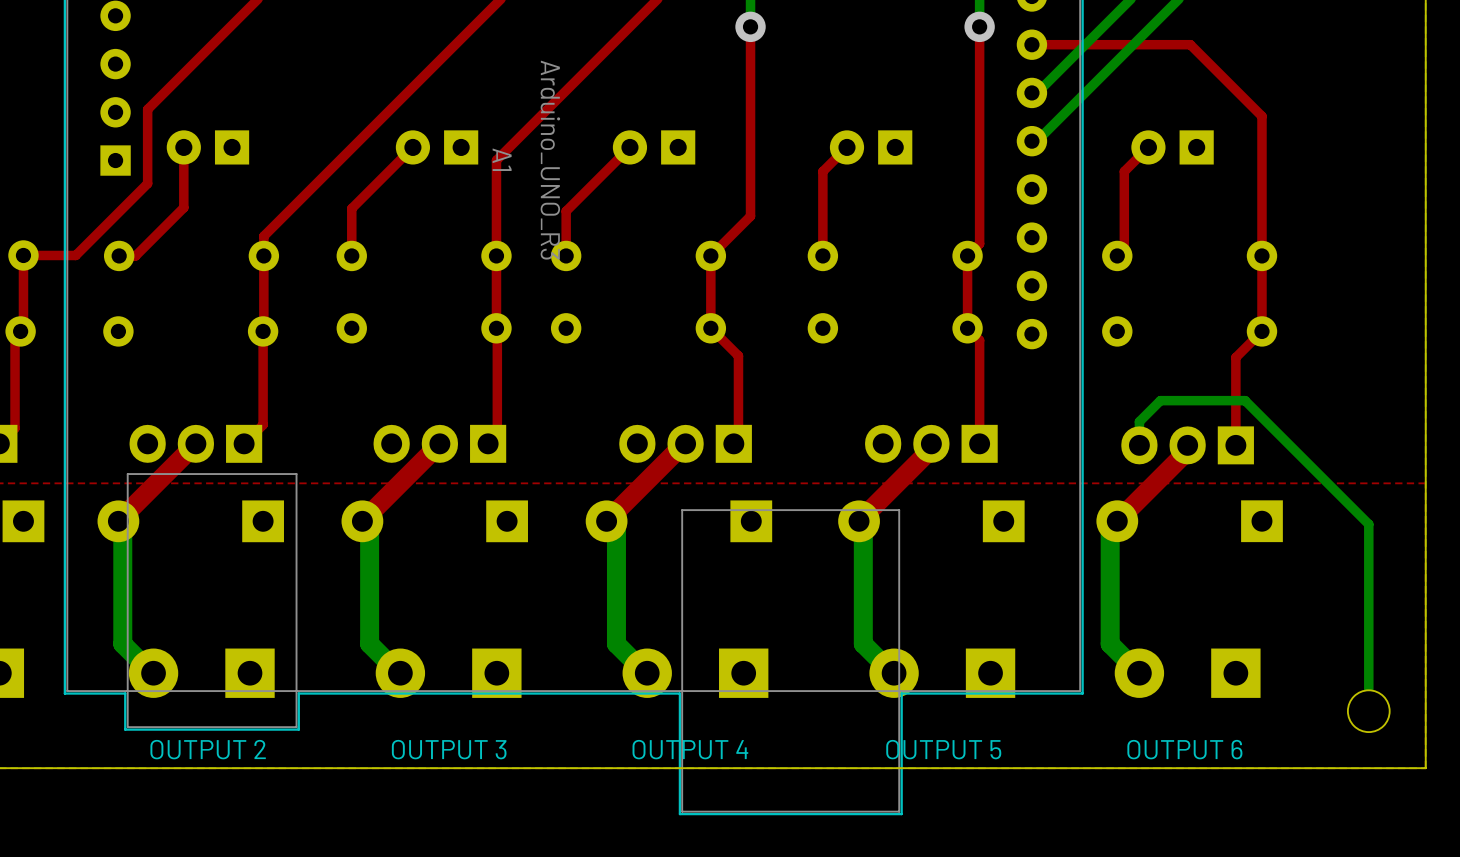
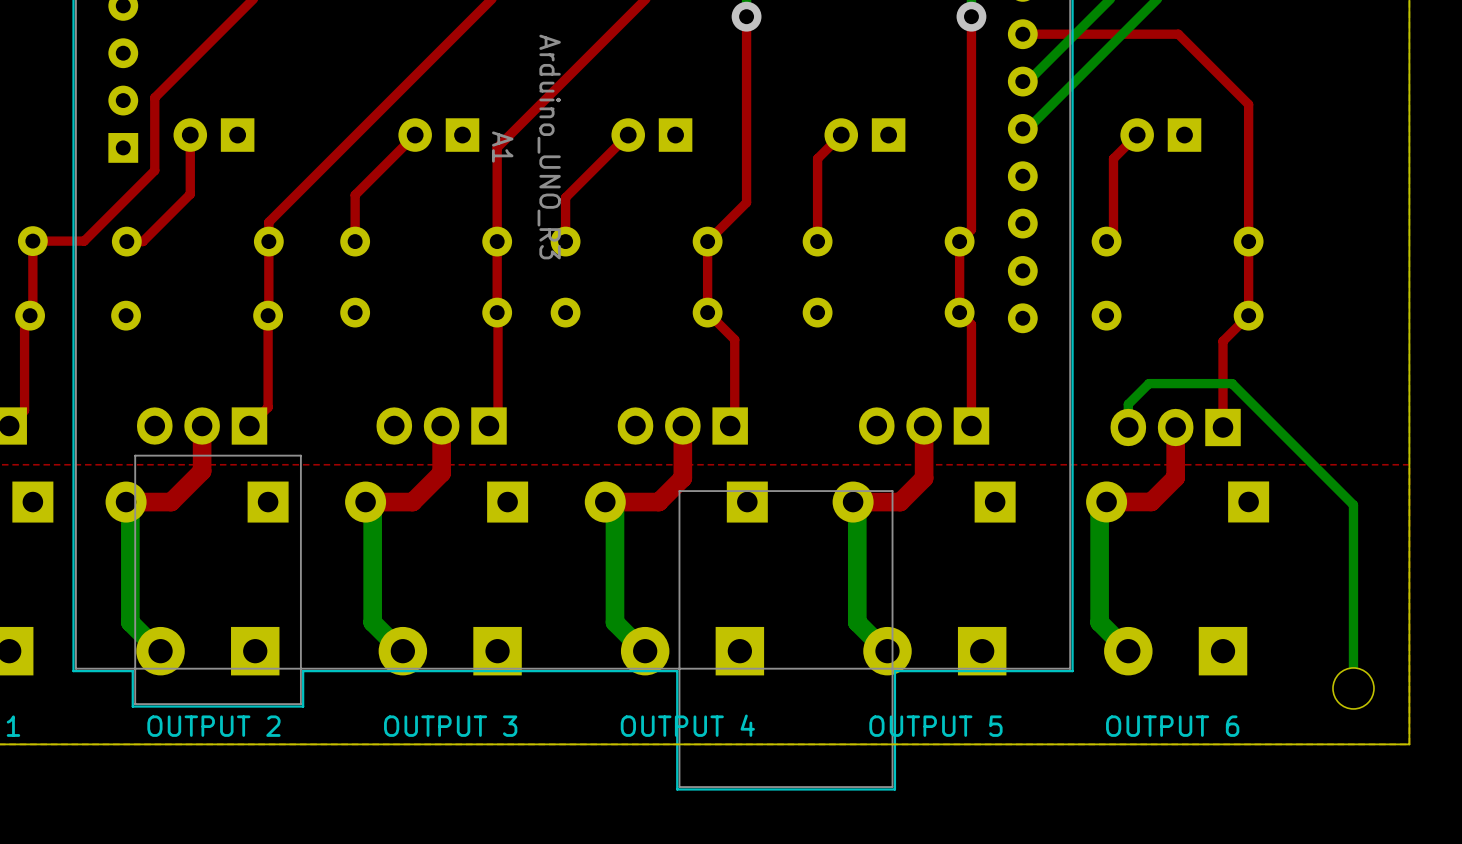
top track: (195, 443) (118, 521) -> (202, 426) (202, 471) (171, 502) (126, 502)
top track: (439, 443) (362, 521) -> (441, 426) (441, 473) (412, 502) (365, 502)
top track: (685, 443) (606, 521) -> (682, 426) (682, 478) (658, 502) (605, 502)
top track: (931, 448) (859, 521) -> (924, 431) (924, 478) (900, 502) (853, 502)
top track: (1187, 450) (1117, 521) -> (1175, 432) (1175, 477) (1151, 501) (1106, 501)

